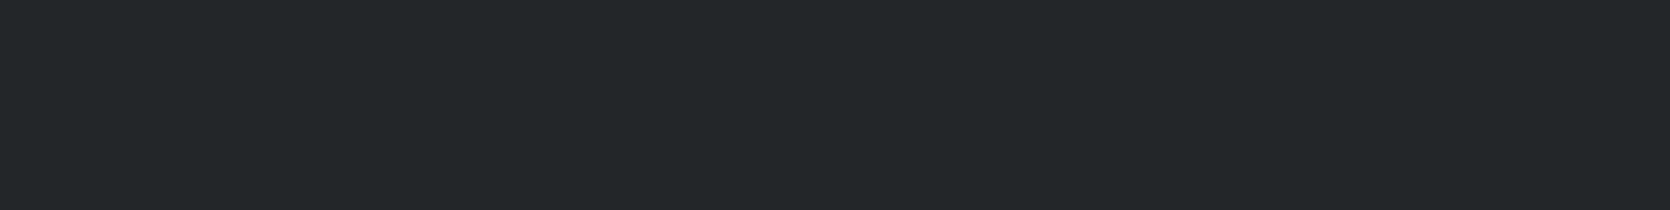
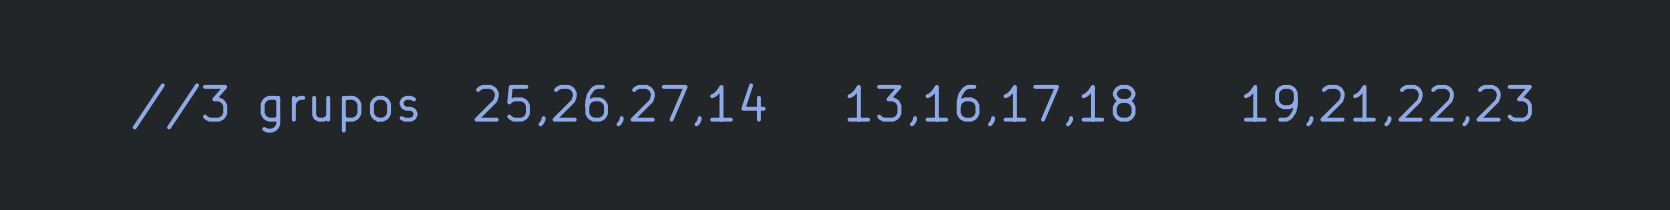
text: none -> //3 grupos 25,26,27,14 13,16,17,18 19,21,22,23 (832, 107)

